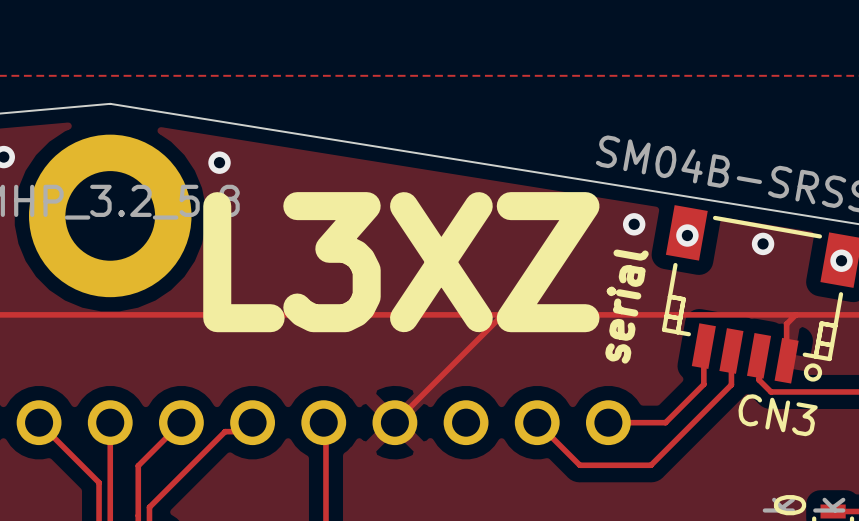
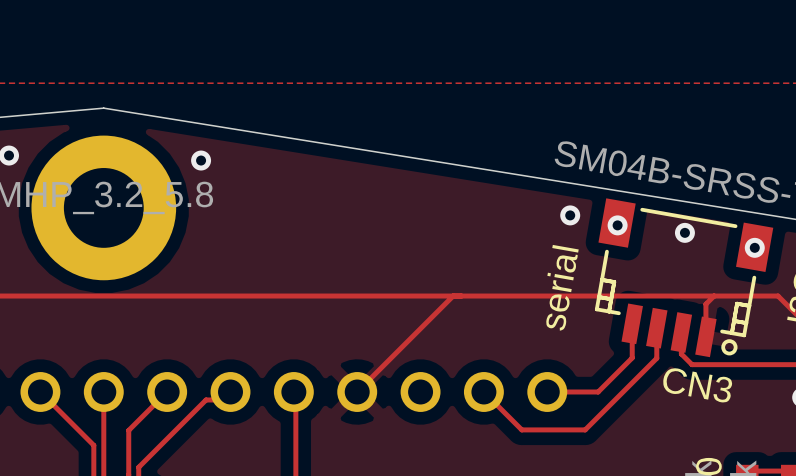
text: L3XZ (401, 262) -> none

